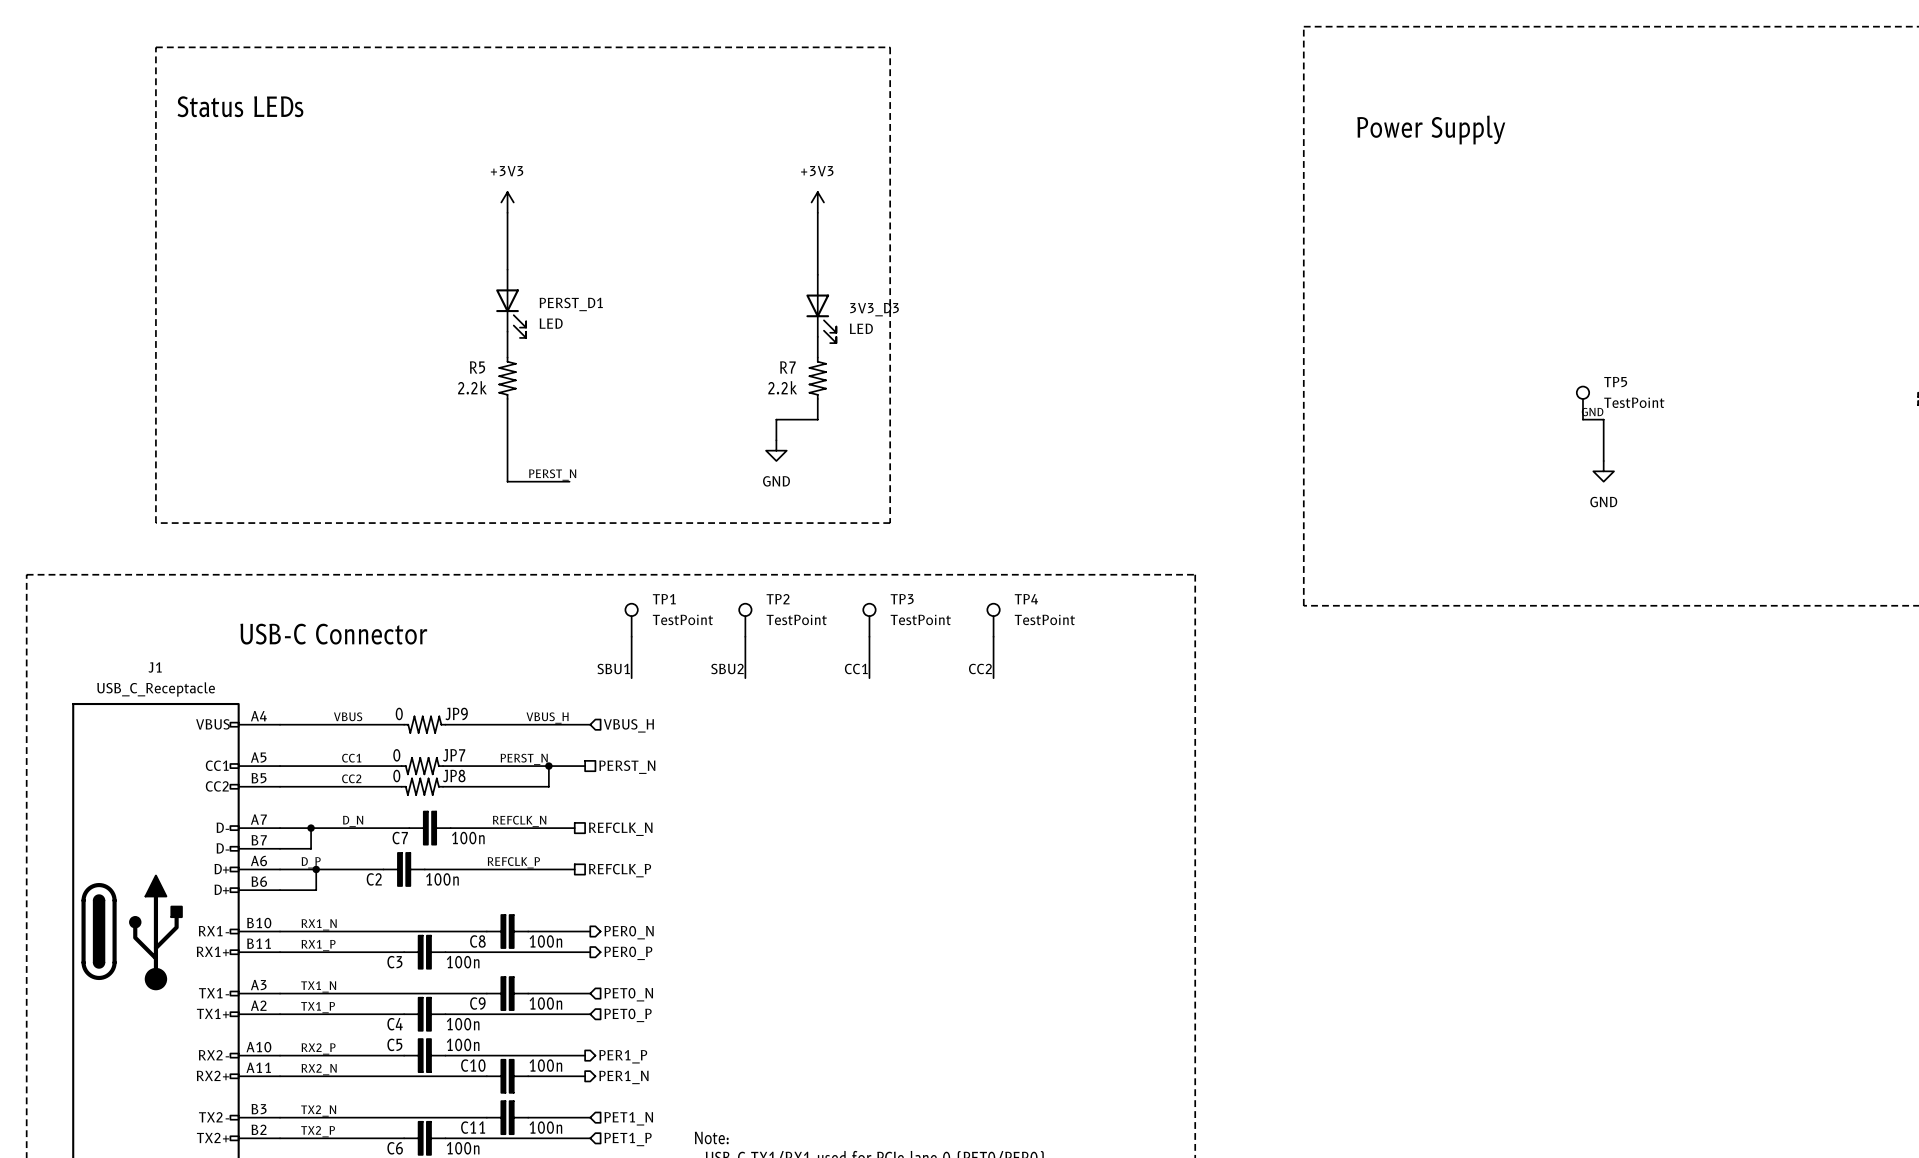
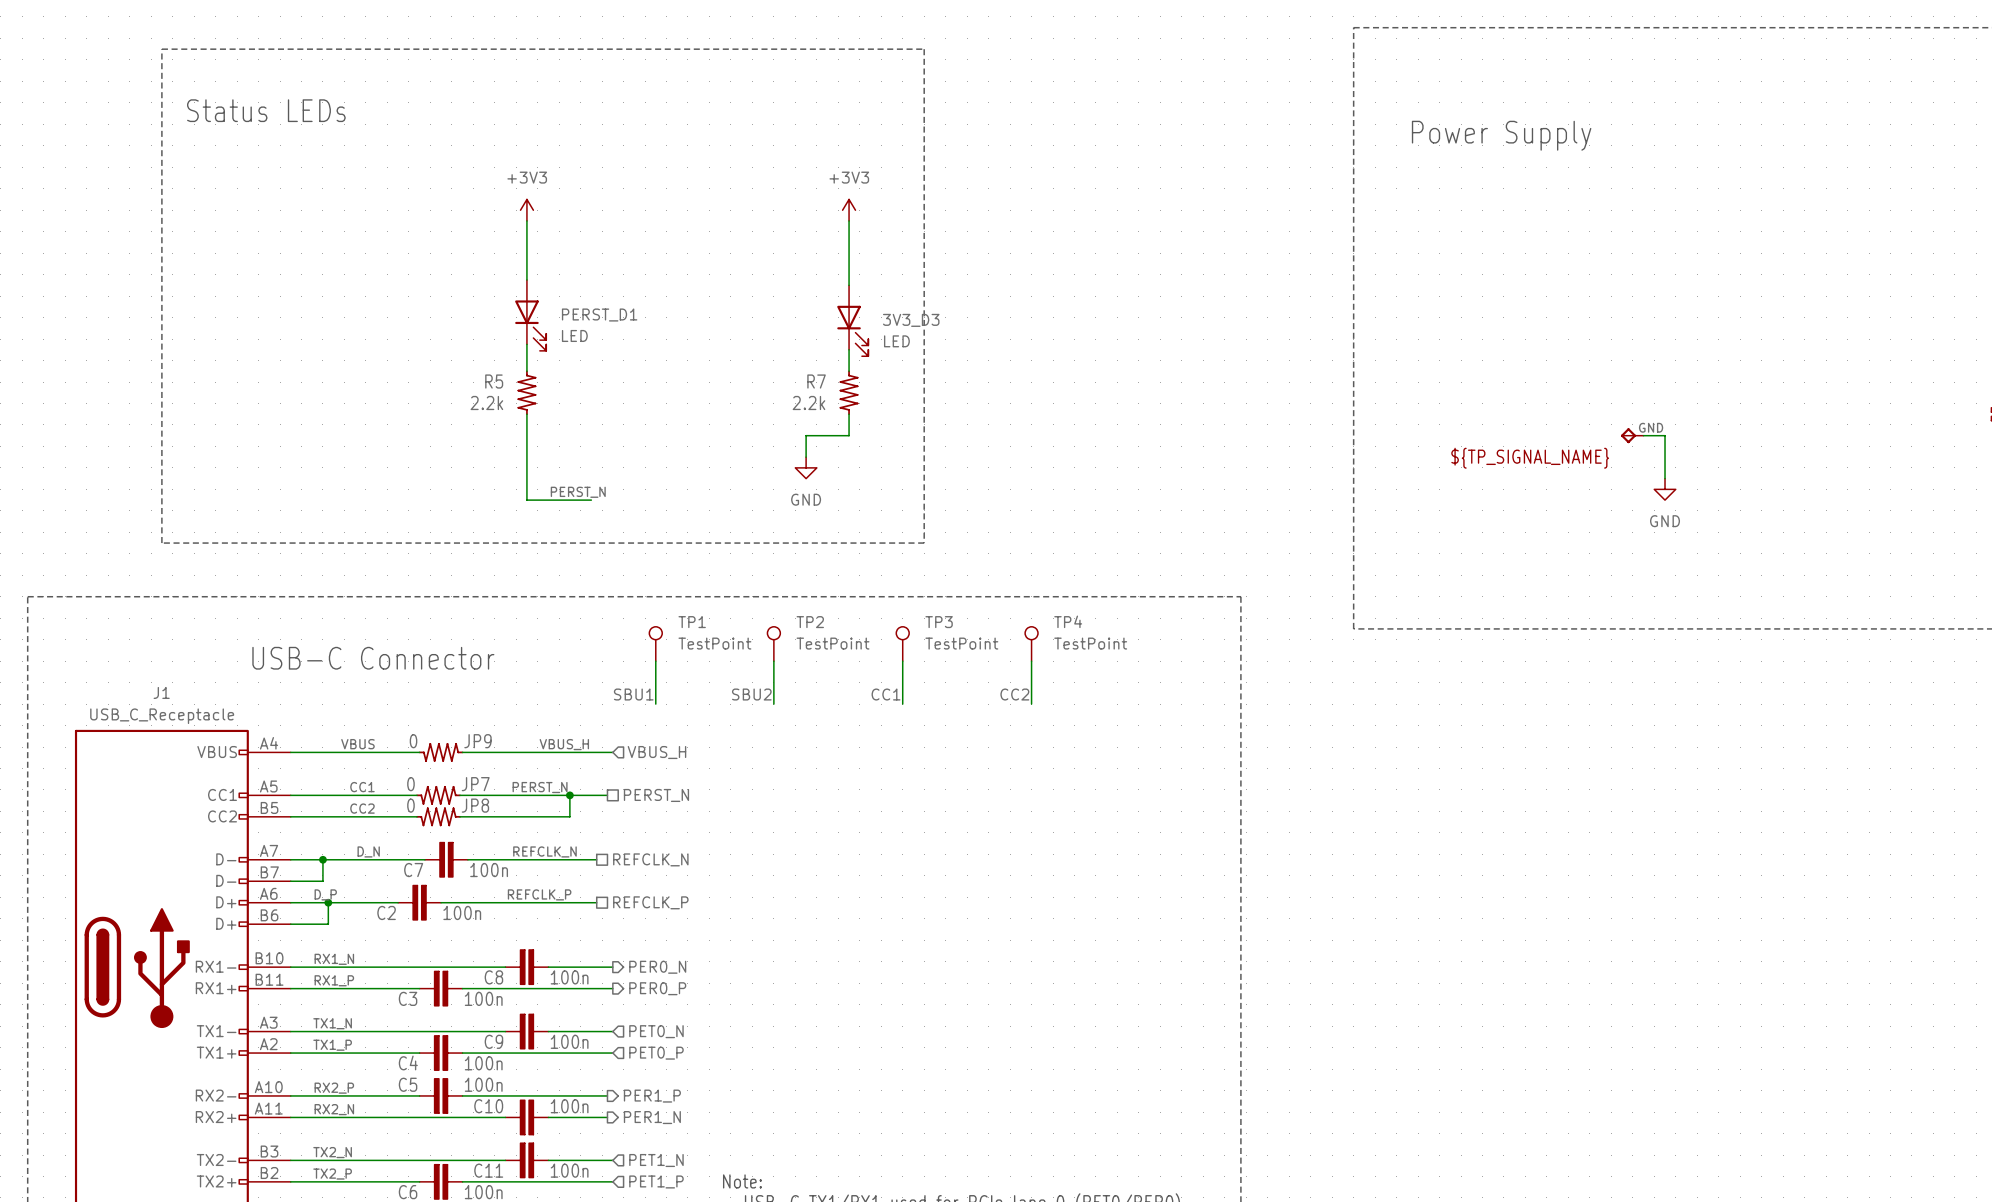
TP5: TestPoint (1582, 403) -> none
part: none -> (1632, 435)

